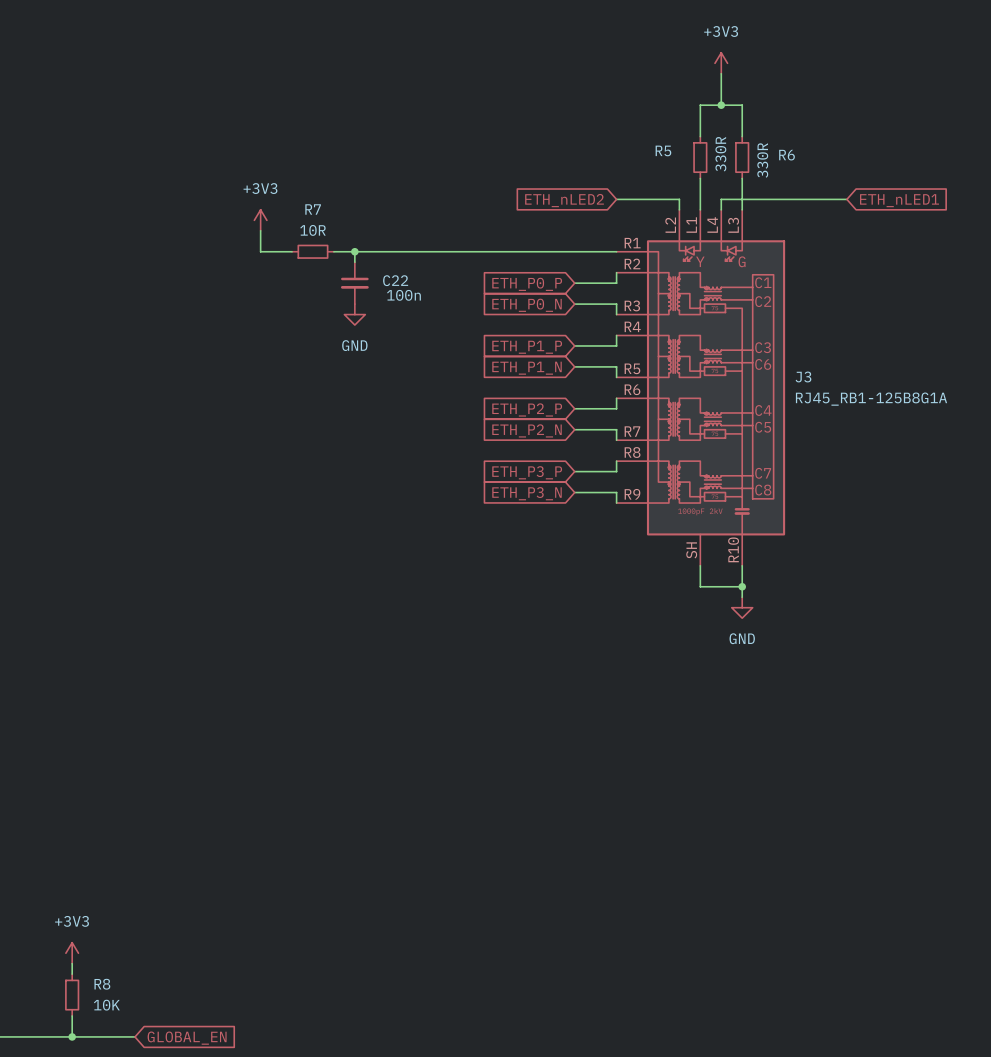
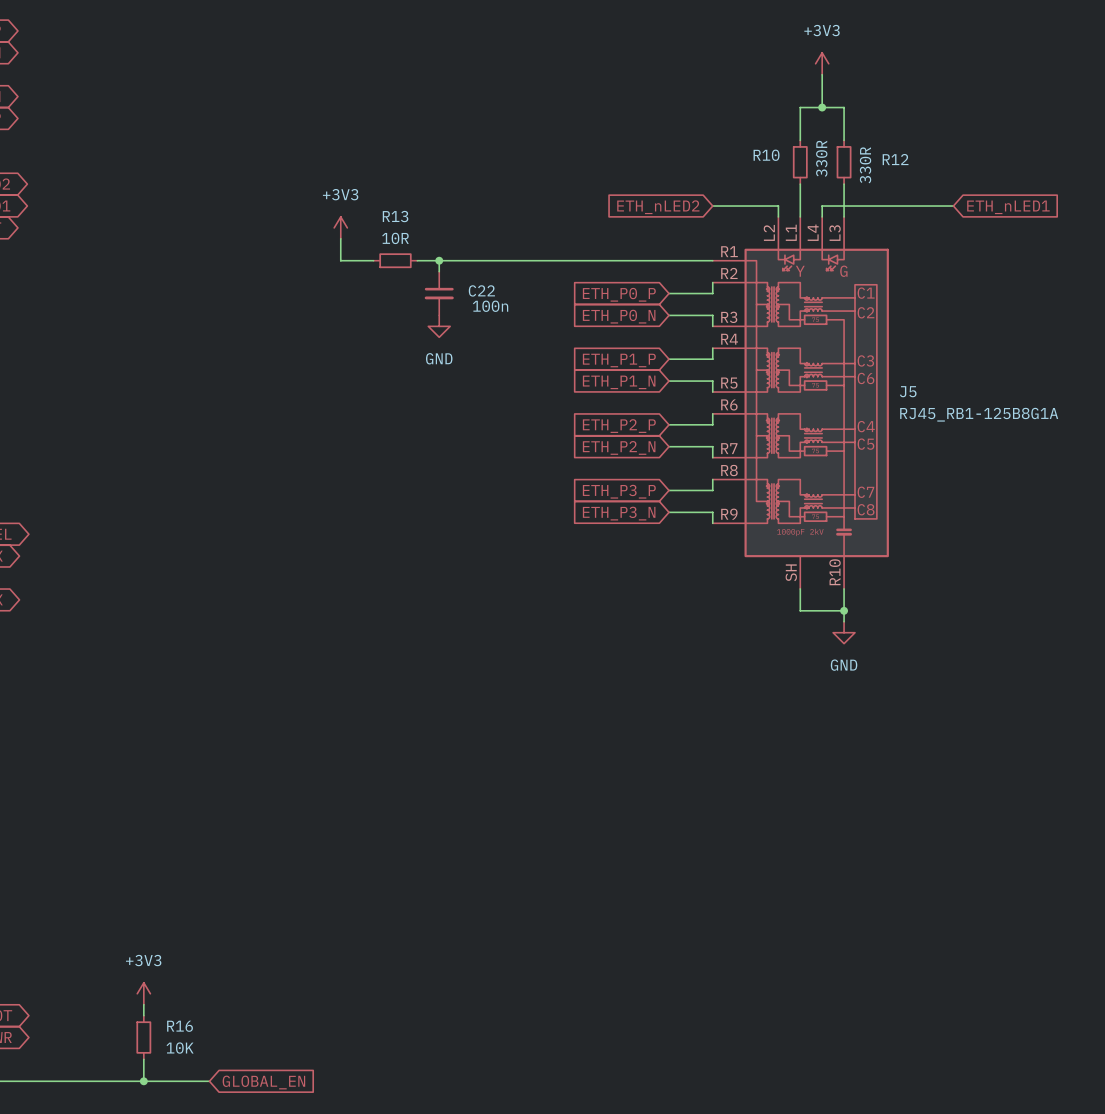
R5 name: R5 (663, 150) -> R10 (766, 155)
R6 name: R6 (787, 155) -> R12 (895, 159)
R7 name: R7 (313, 209) -> R13 (395, 216)
J3 name: J3 (803, 376) -> J5 (908, 391)
R8 name: R8 (102, 984) -> R16 (180, 1026)

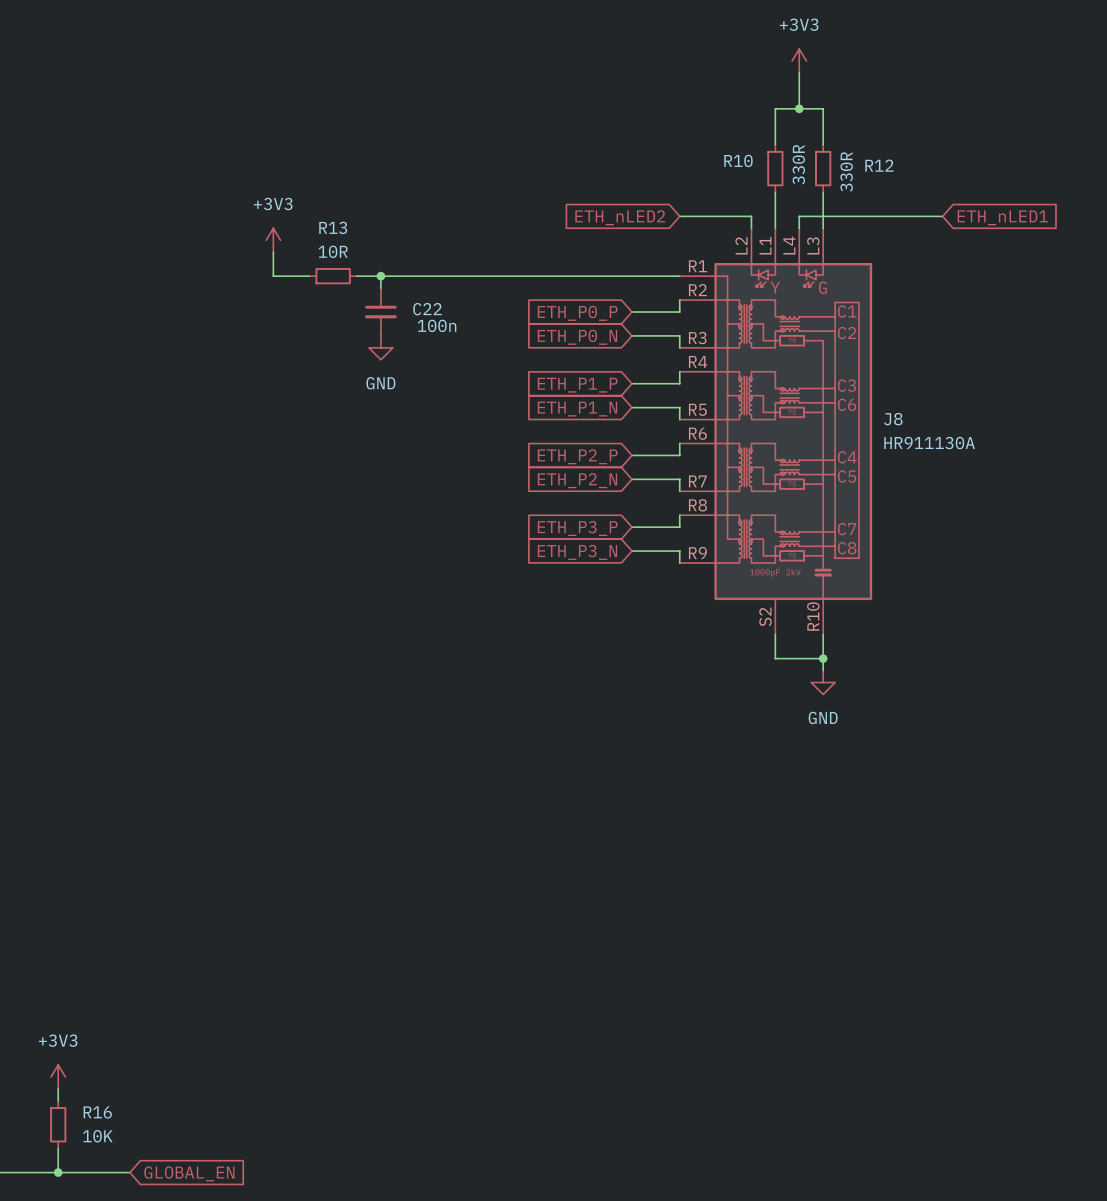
J5 name: J5 (908, 391) -> J8 (893, 419)
J5 value: RJ45_RB1-125B8G1A (979, 414) -> HR911130A (929, 443)
J5 pin number: SH (791, 572) -> S2 (765, 616)

